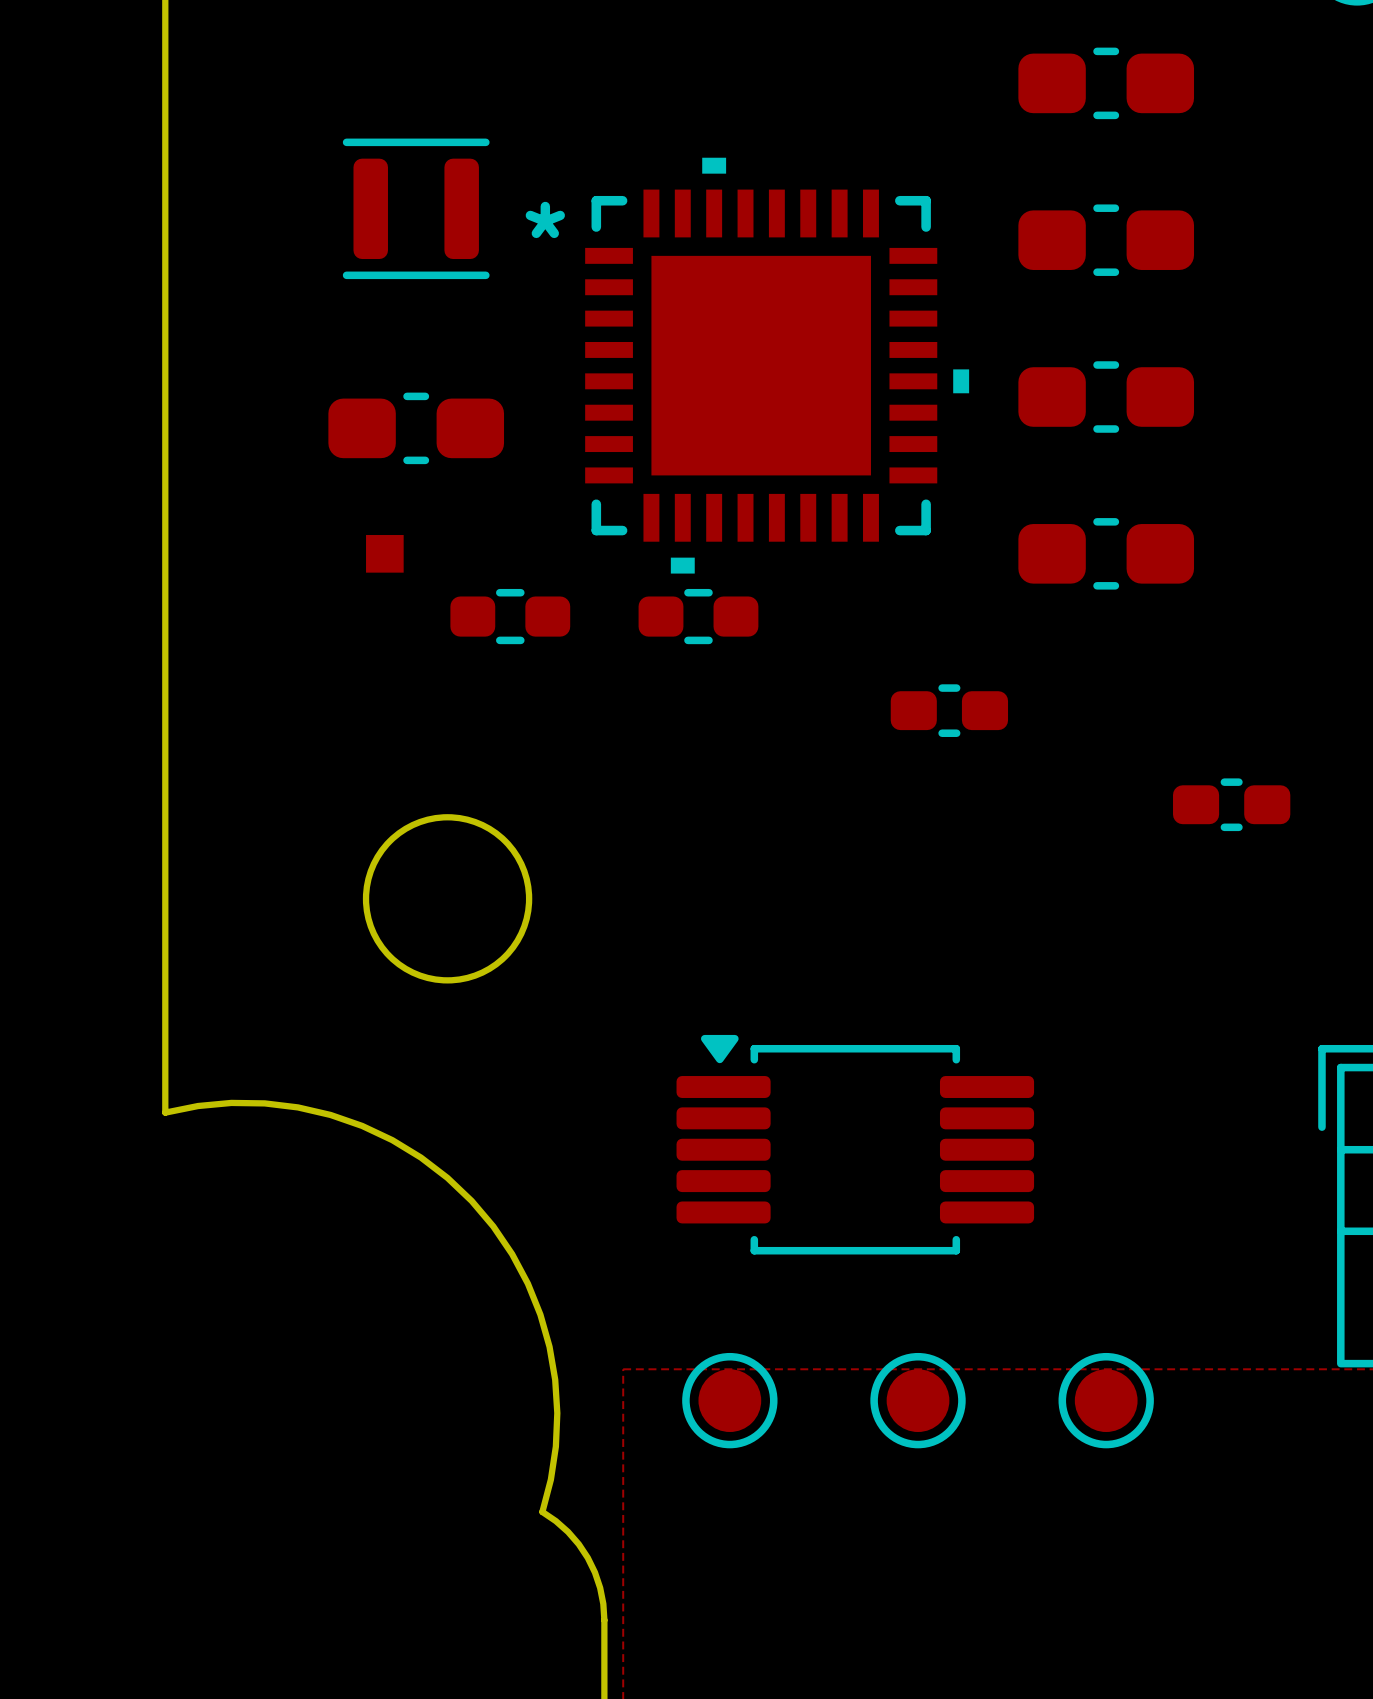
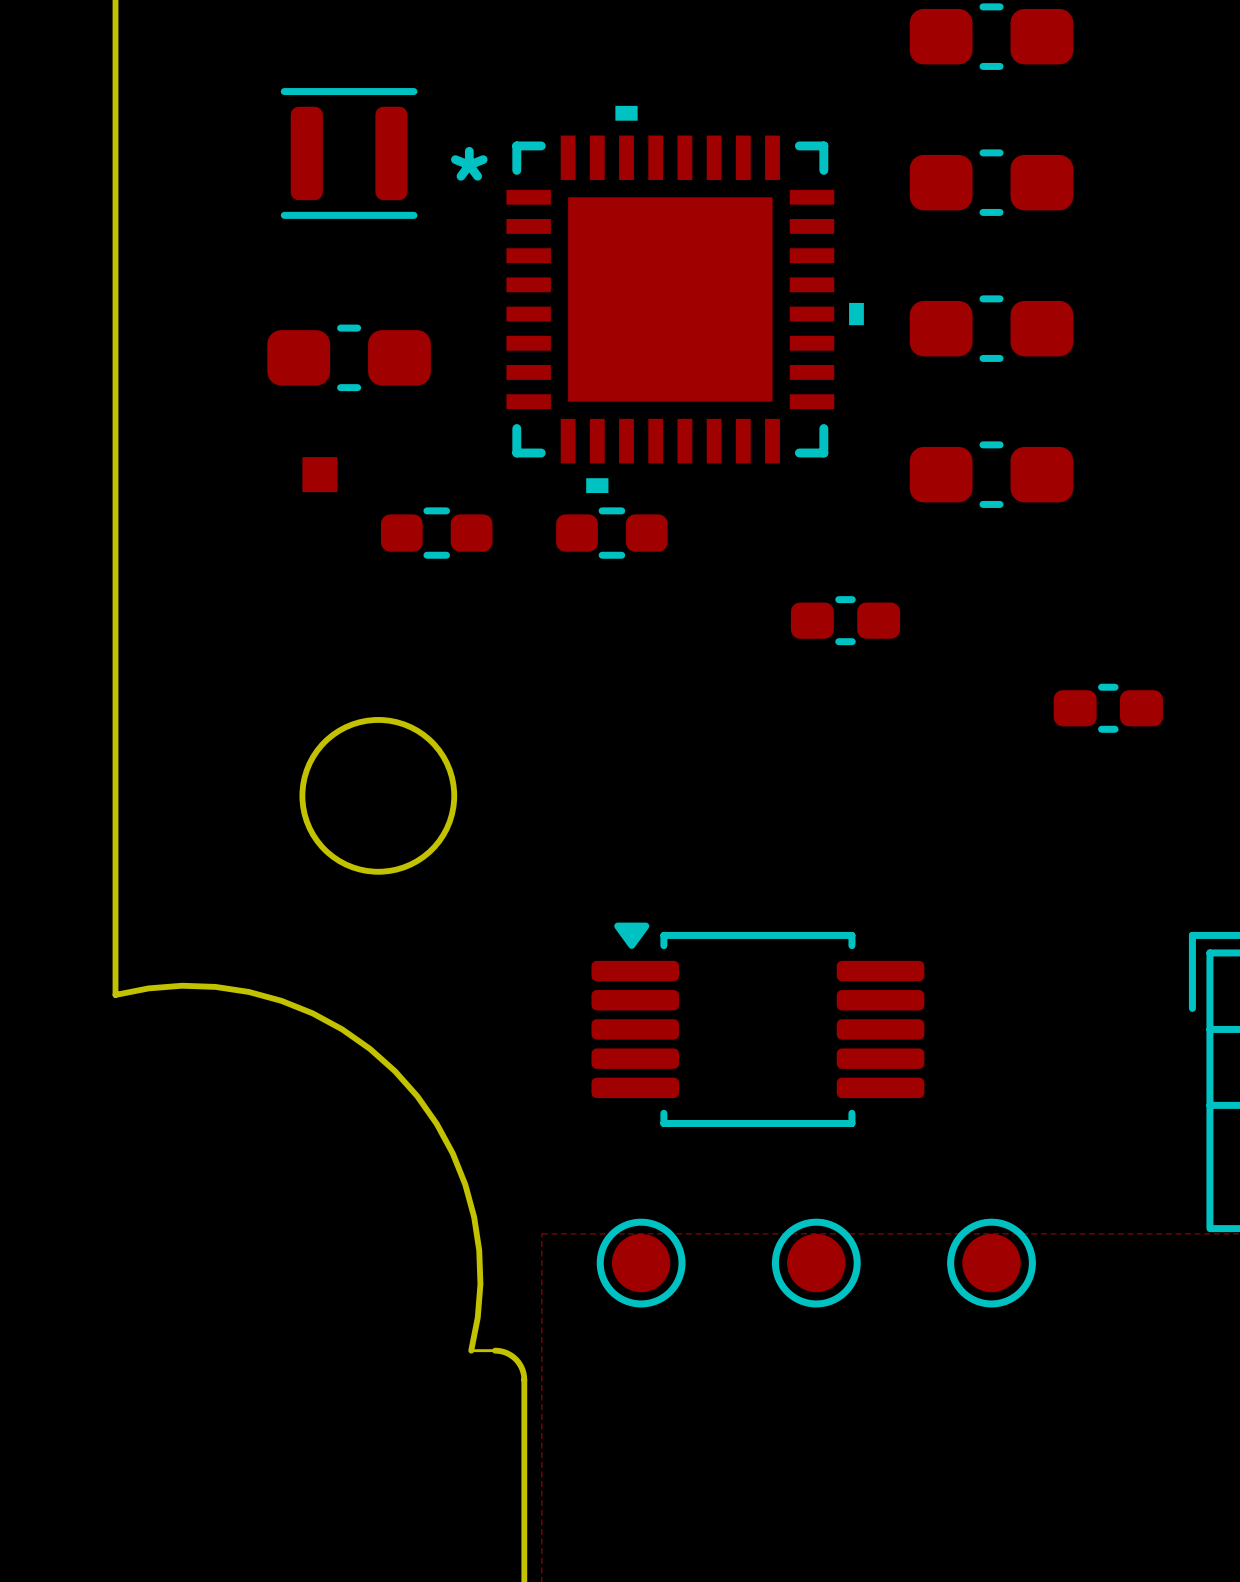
board edge: (165, 1112) (198, 1106) (231, 1102) (264, 1103) (298, 1107) (330, 1114) (362, 1125) (392, 1140) (420, 1157) (447, 1177) (471, 1200) (493, 1226) (512, 1254) (527, 1283) (540, 1314) (549, 1346) (555, 1379) (557, 1413) (555, 1446) (550, 1479) (542, 1511) (568, 1531) (587, 1557) (600, 1587) (604, 1620) -> (115, 994) (148, 988) (182, 985) (215, 986) (249, 991) (281, 1000) (312, 1013) (342, 1029) (369, 1048) (394, 1071) (417, 1096) (436, 1123) (452, 1153) (465, 1184) (474, 1217) (479, 1250) (480, 1284) (477, 1317) (471, 1350) (504, 1352) (515, 1359) (522, 1370) (524, 1467)

